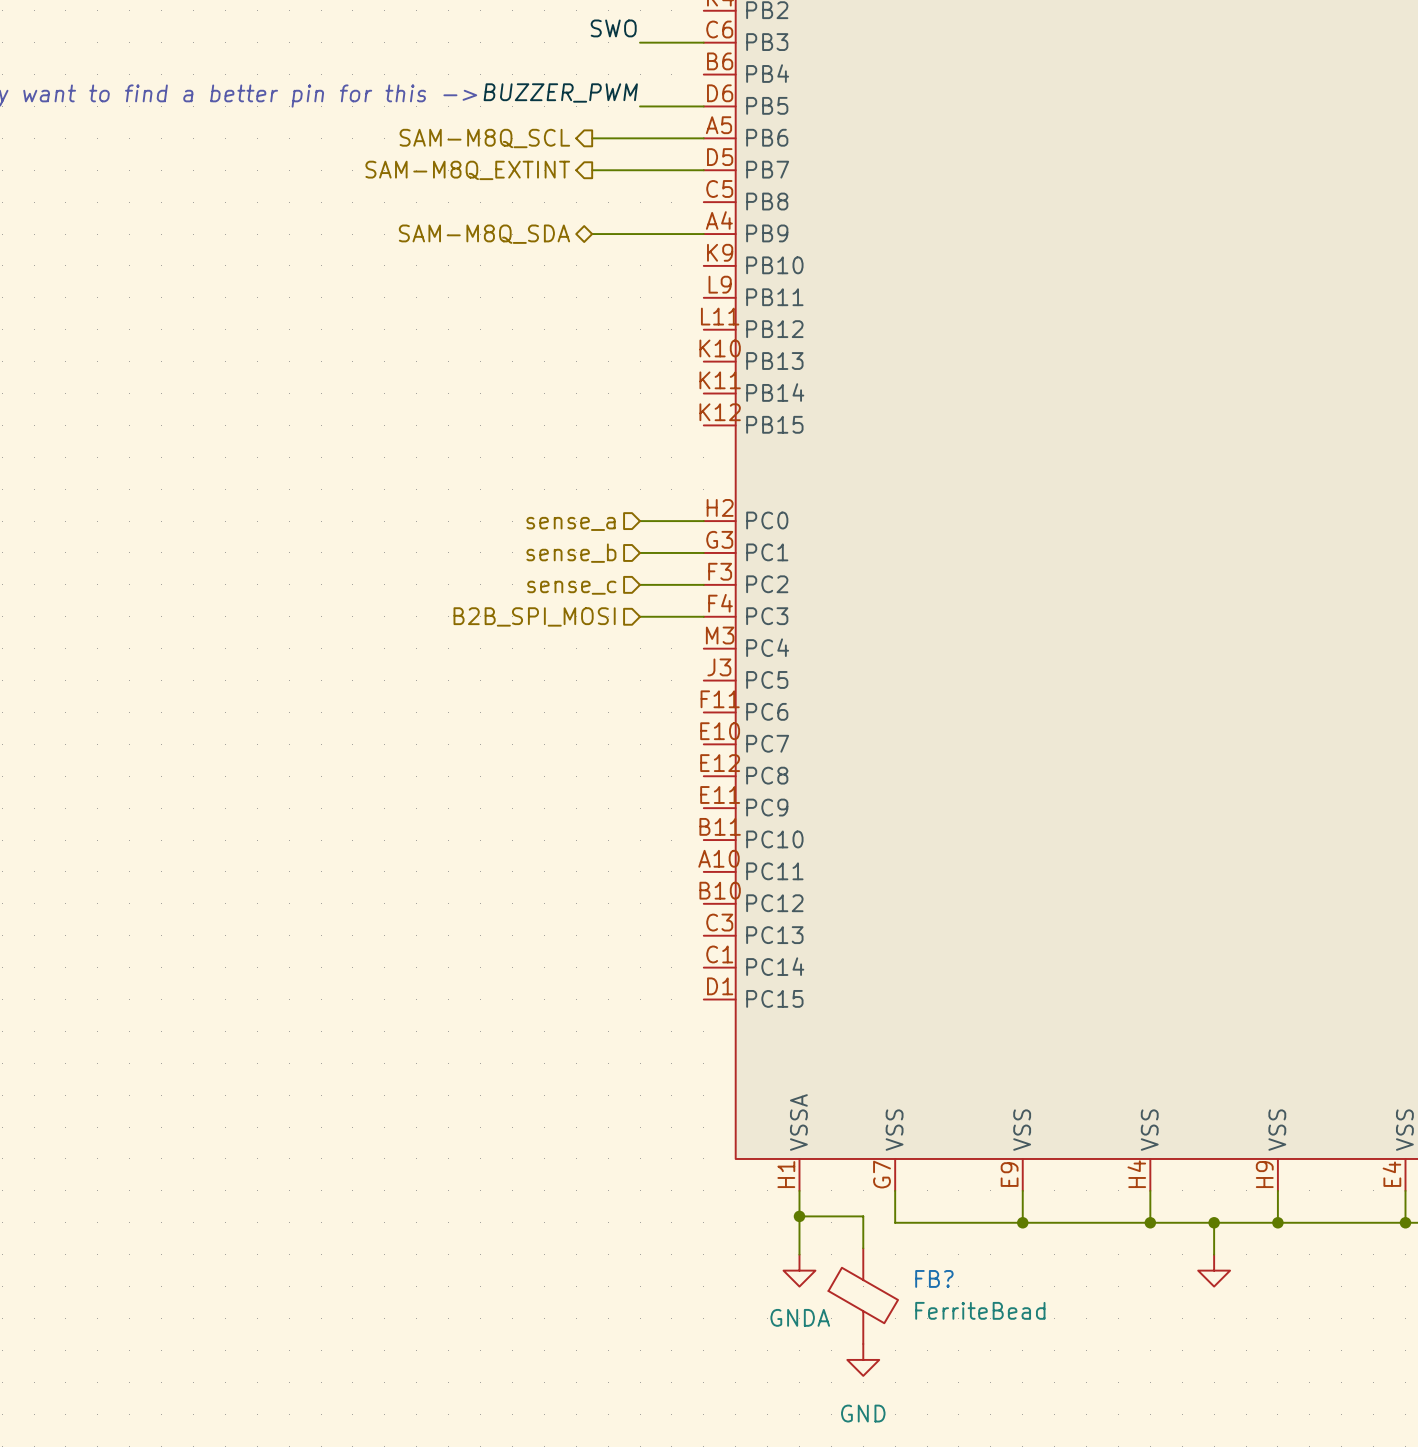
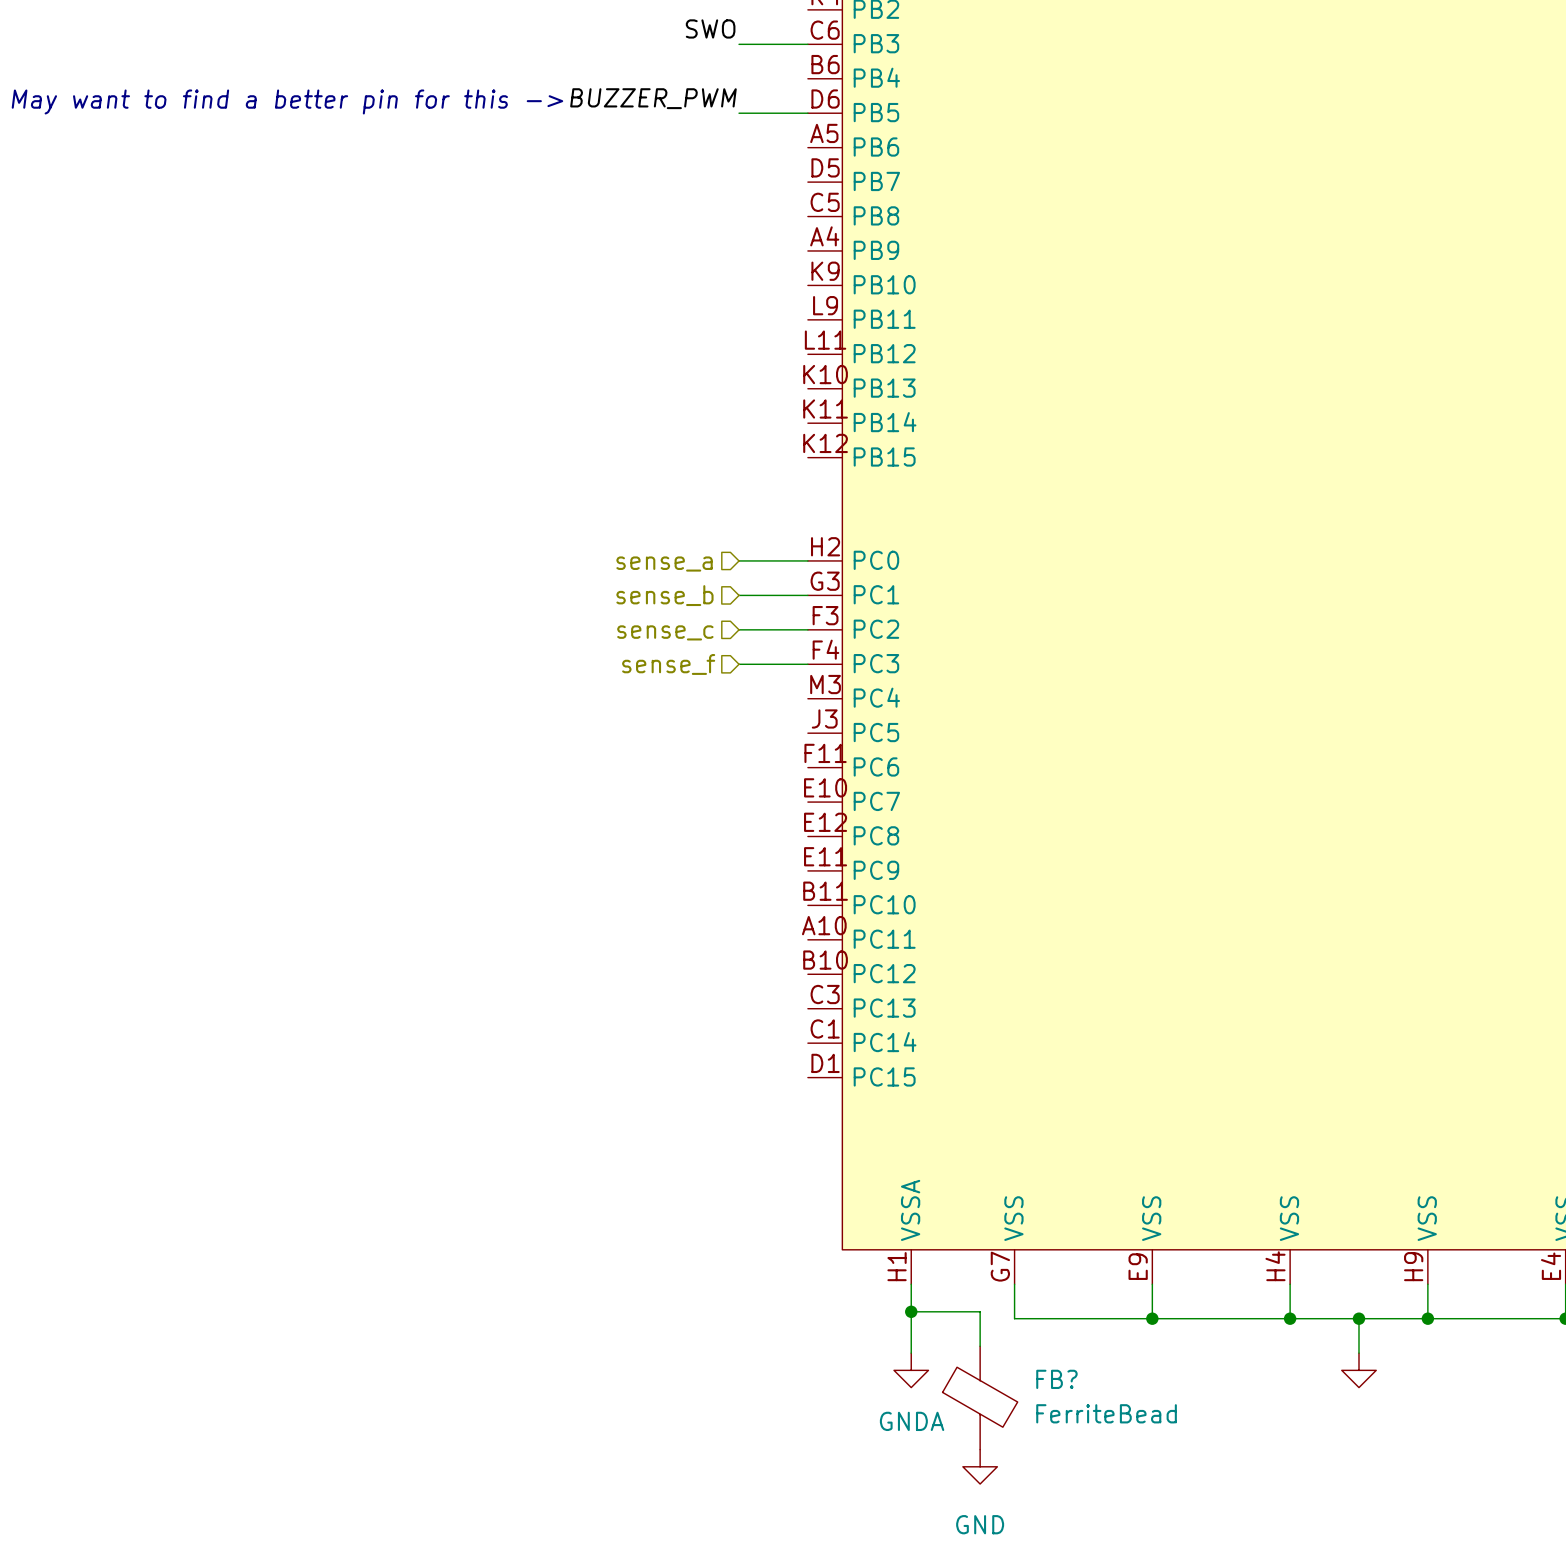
hierarchical label: SAM-M8Q_SCL (484, 138) -> none
wire: (592, 138) (703, 138) -> none
hierarchical label: SAM-M8Q_EXTINT (467, 170) -> none
wire: (592, 170) (703, 170) -> none
hierarchical label: SAM-M8Q_SDA (484, 234) -> none
wire: (592, 234) (703, 234) -> none
hierarchical label: B2B_SPI_MOSI (534, 616) -> sense_f (668, 664)

